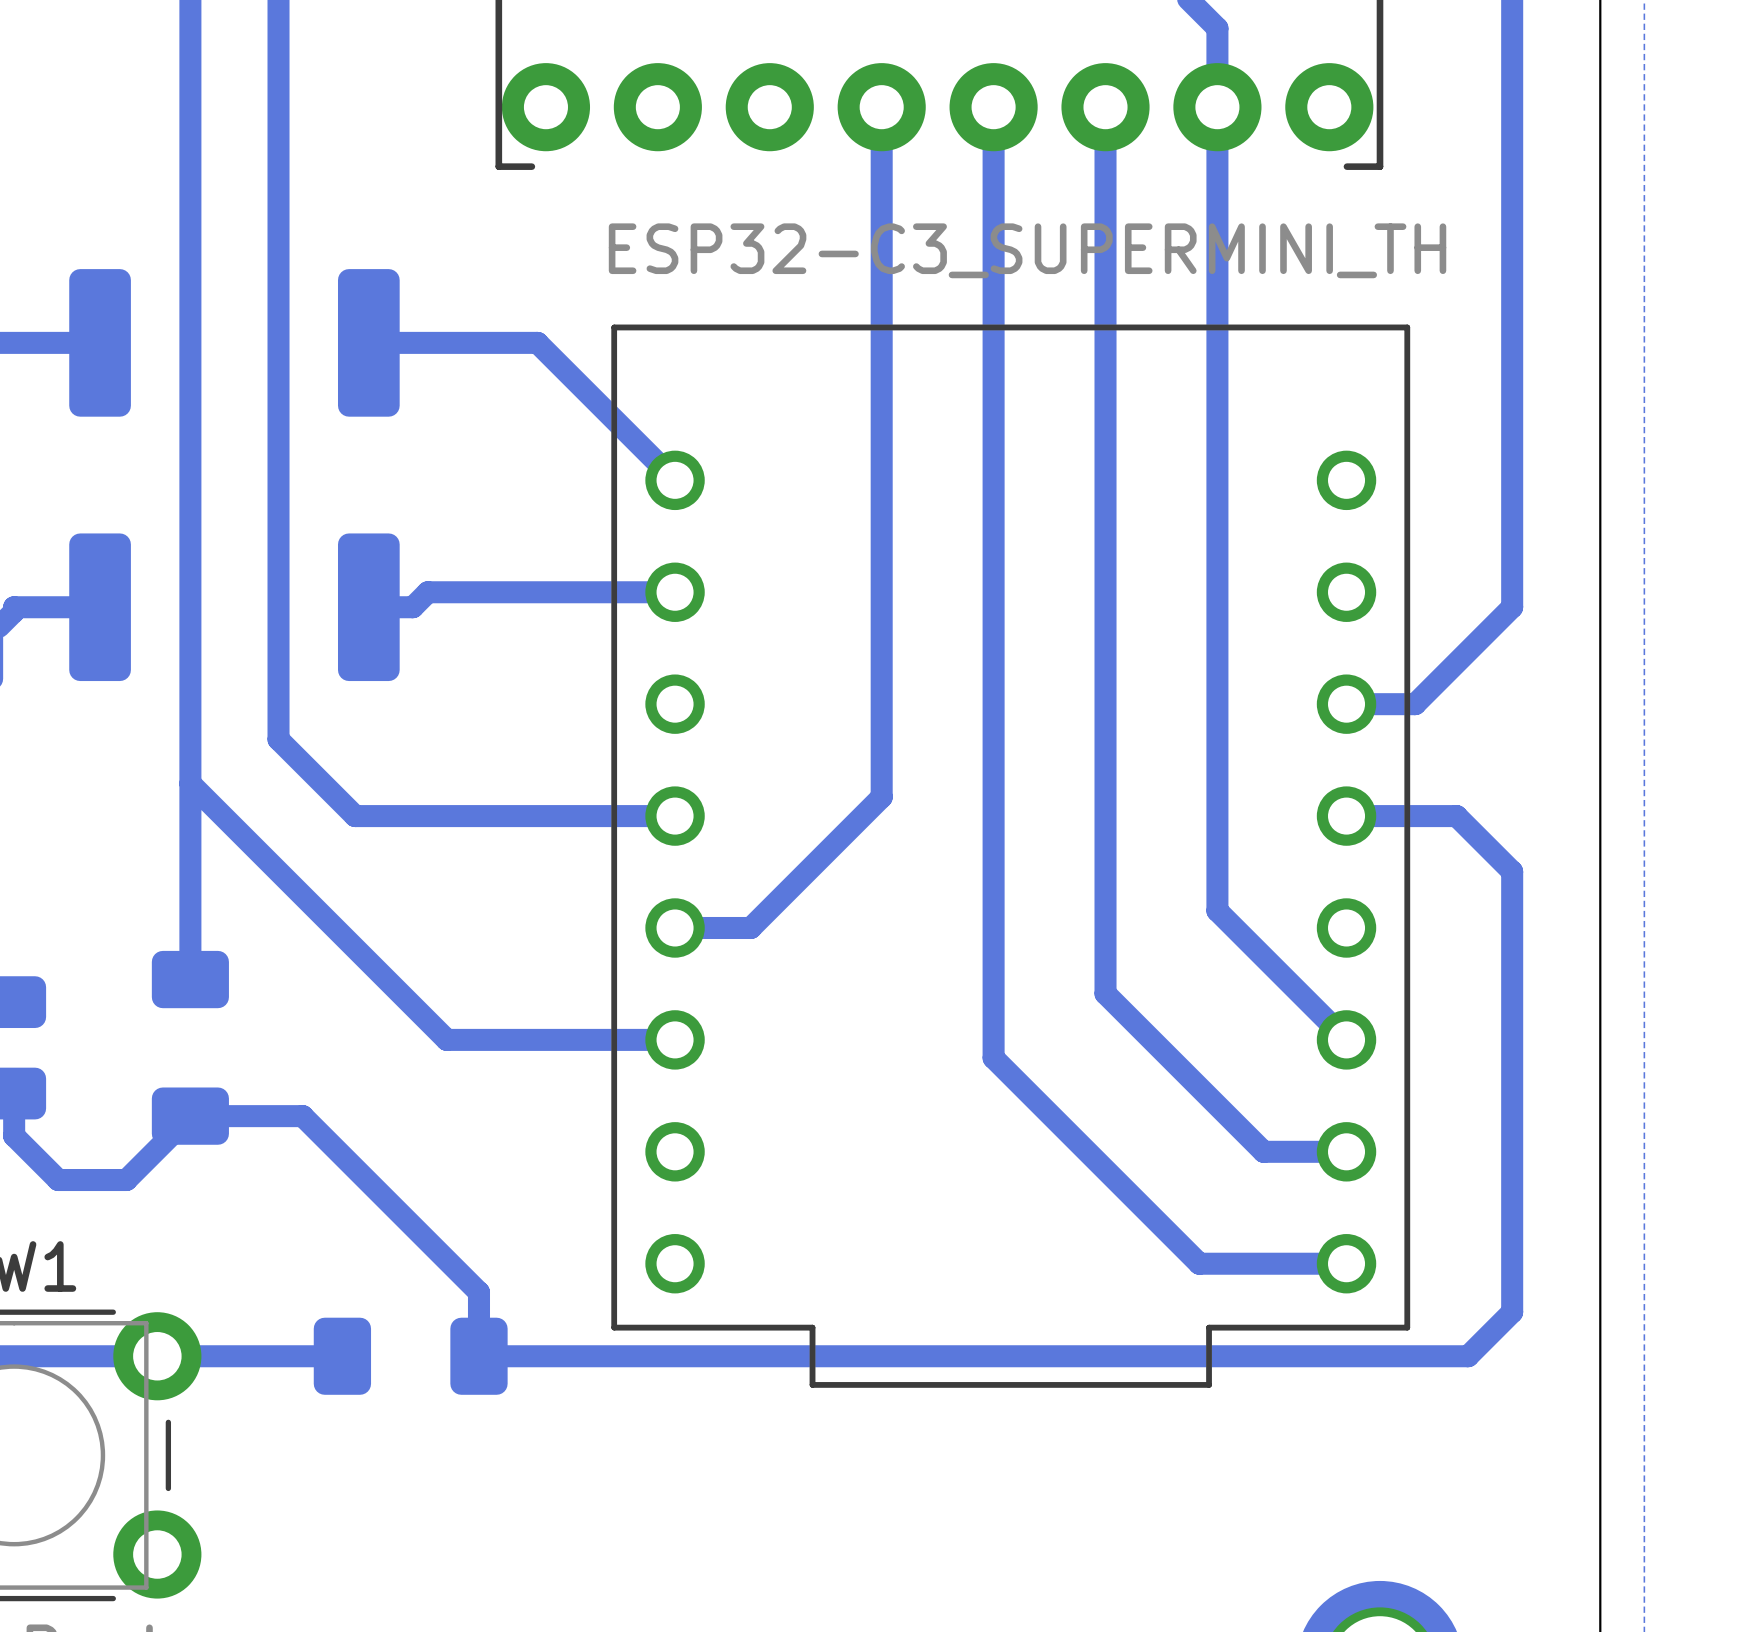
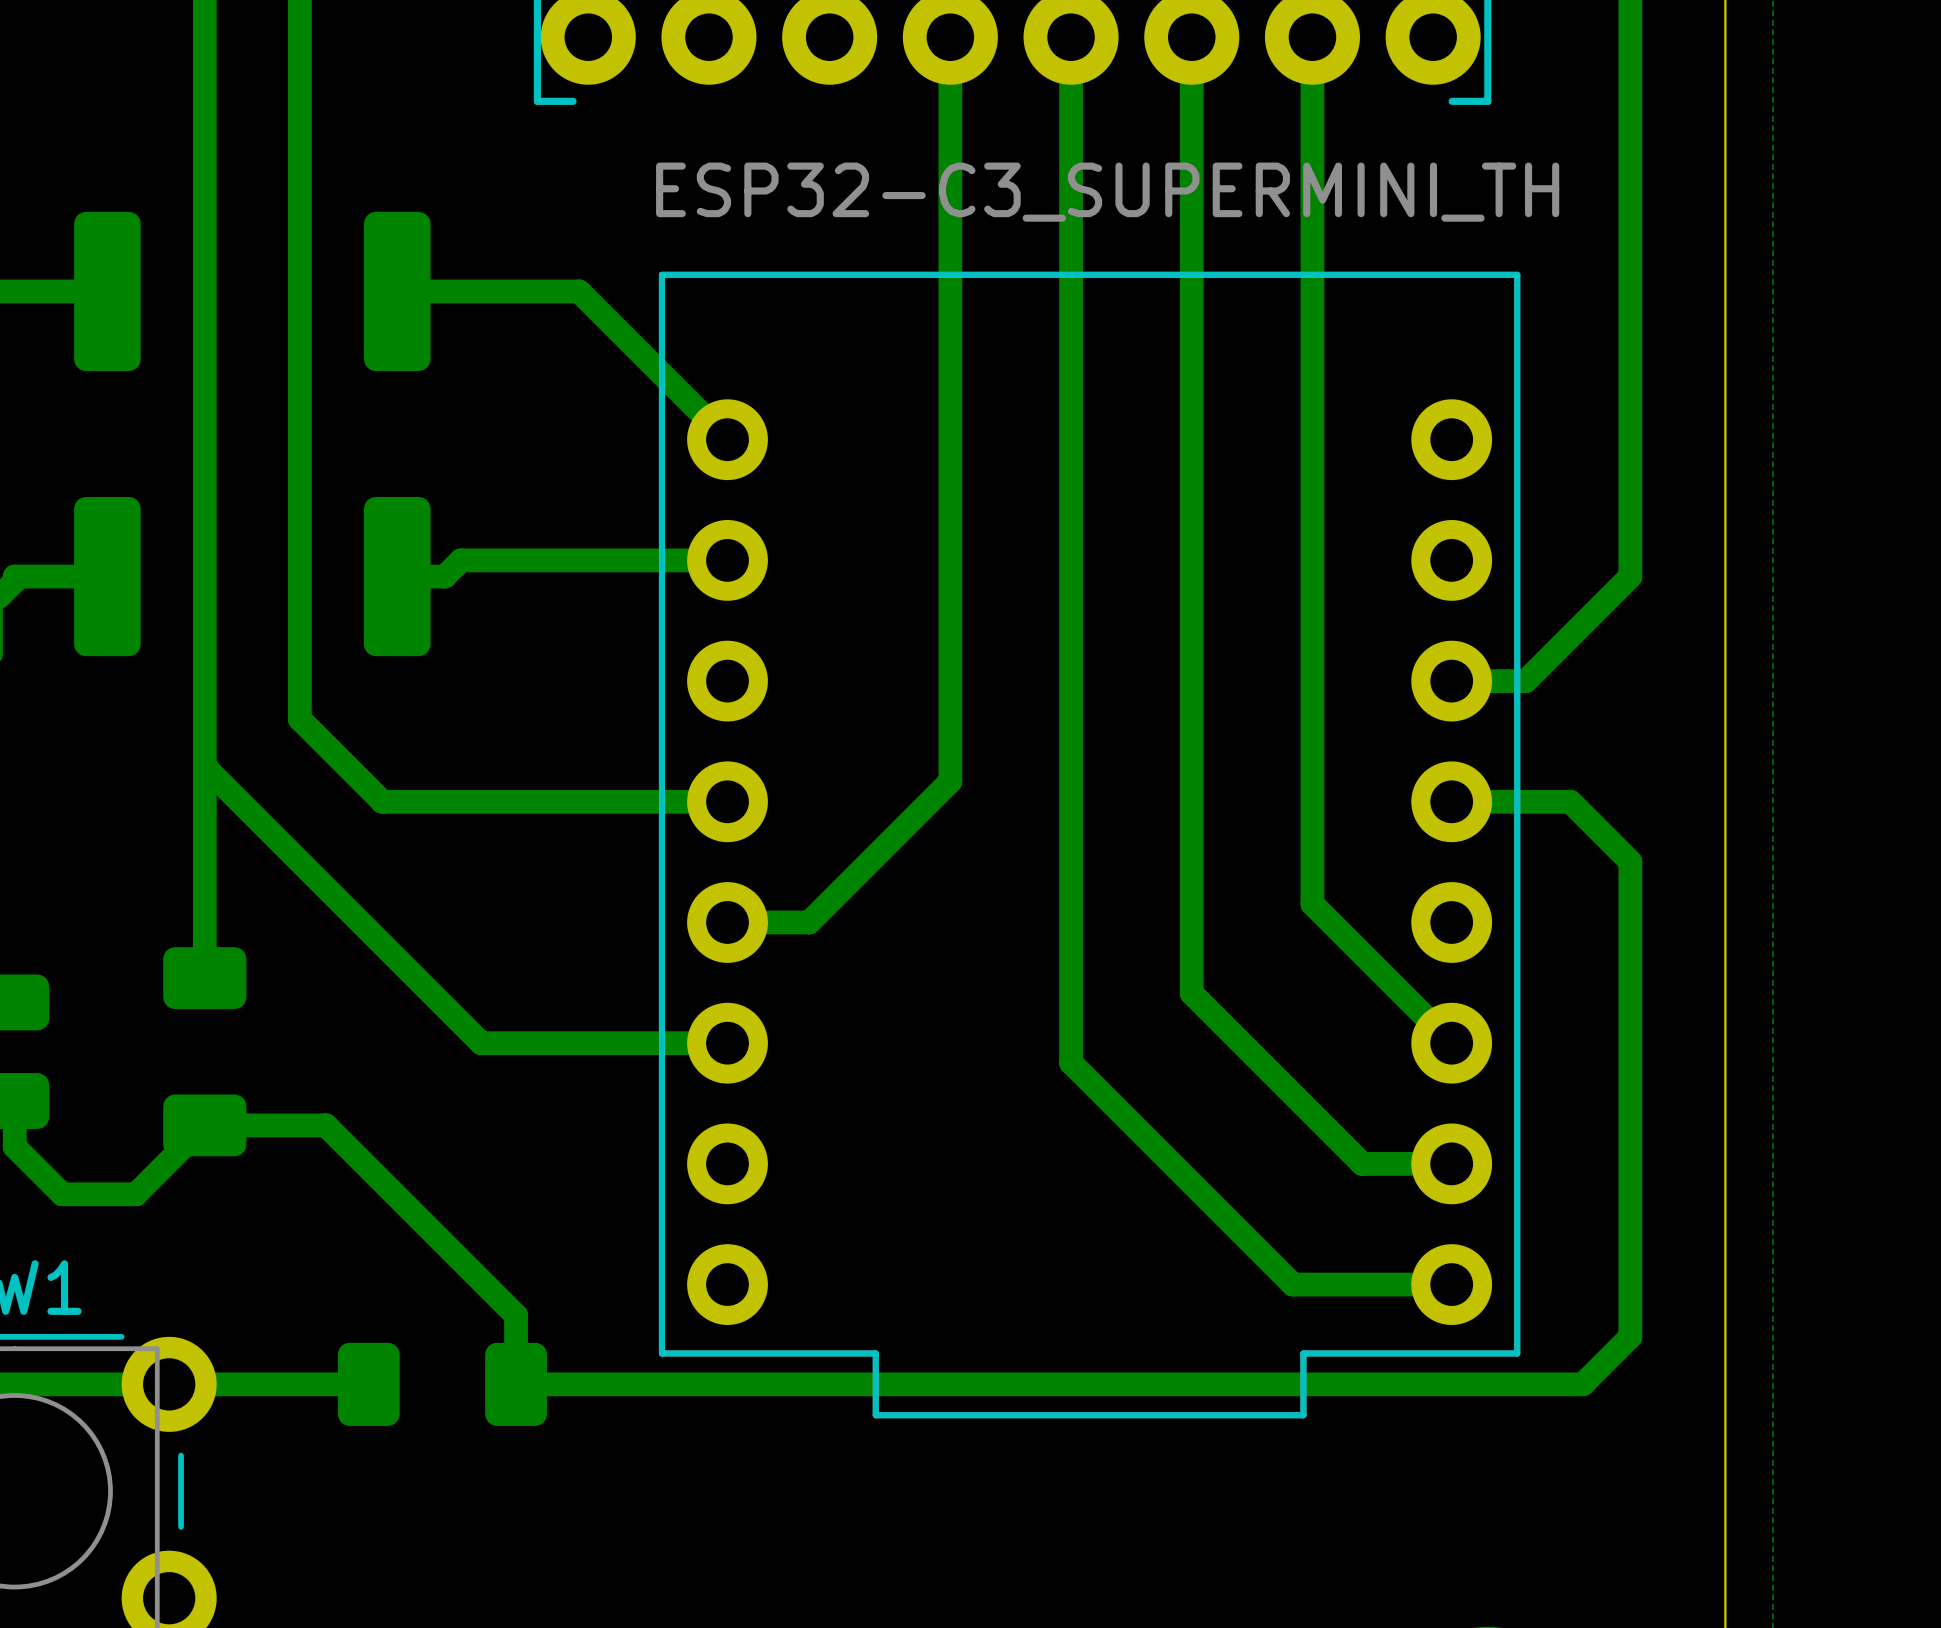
part footprint: [611, 324, 1411, 1388] -> [658, 271, 1521, 1419]

